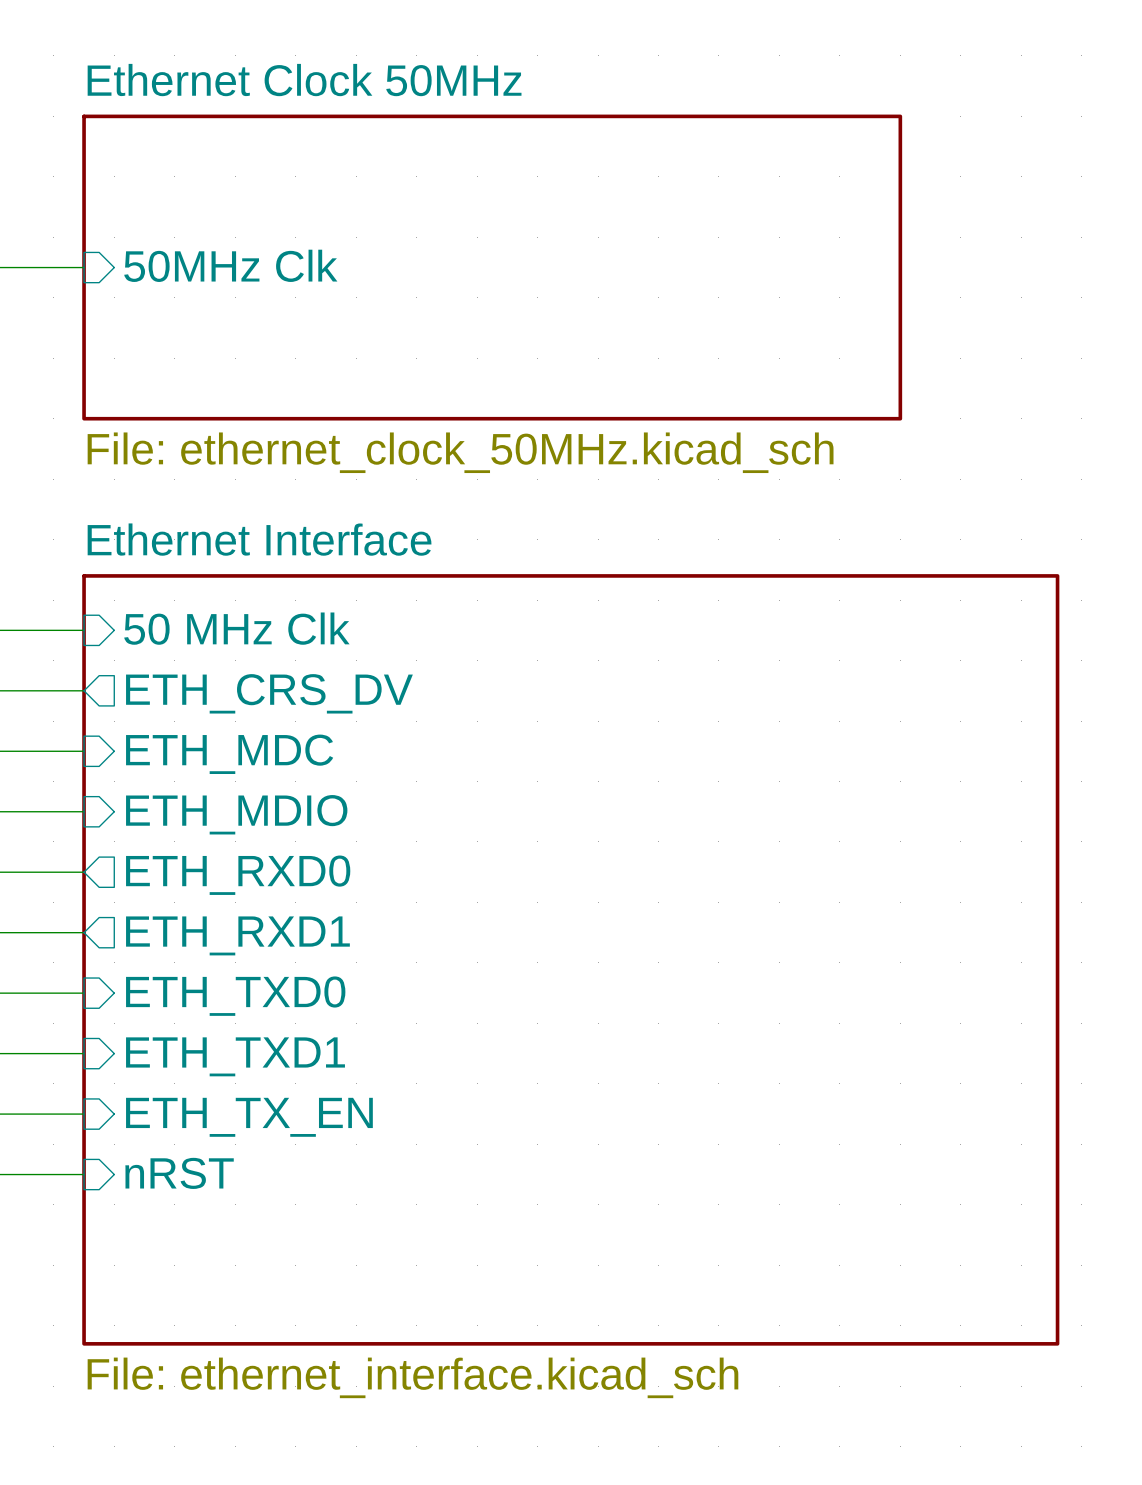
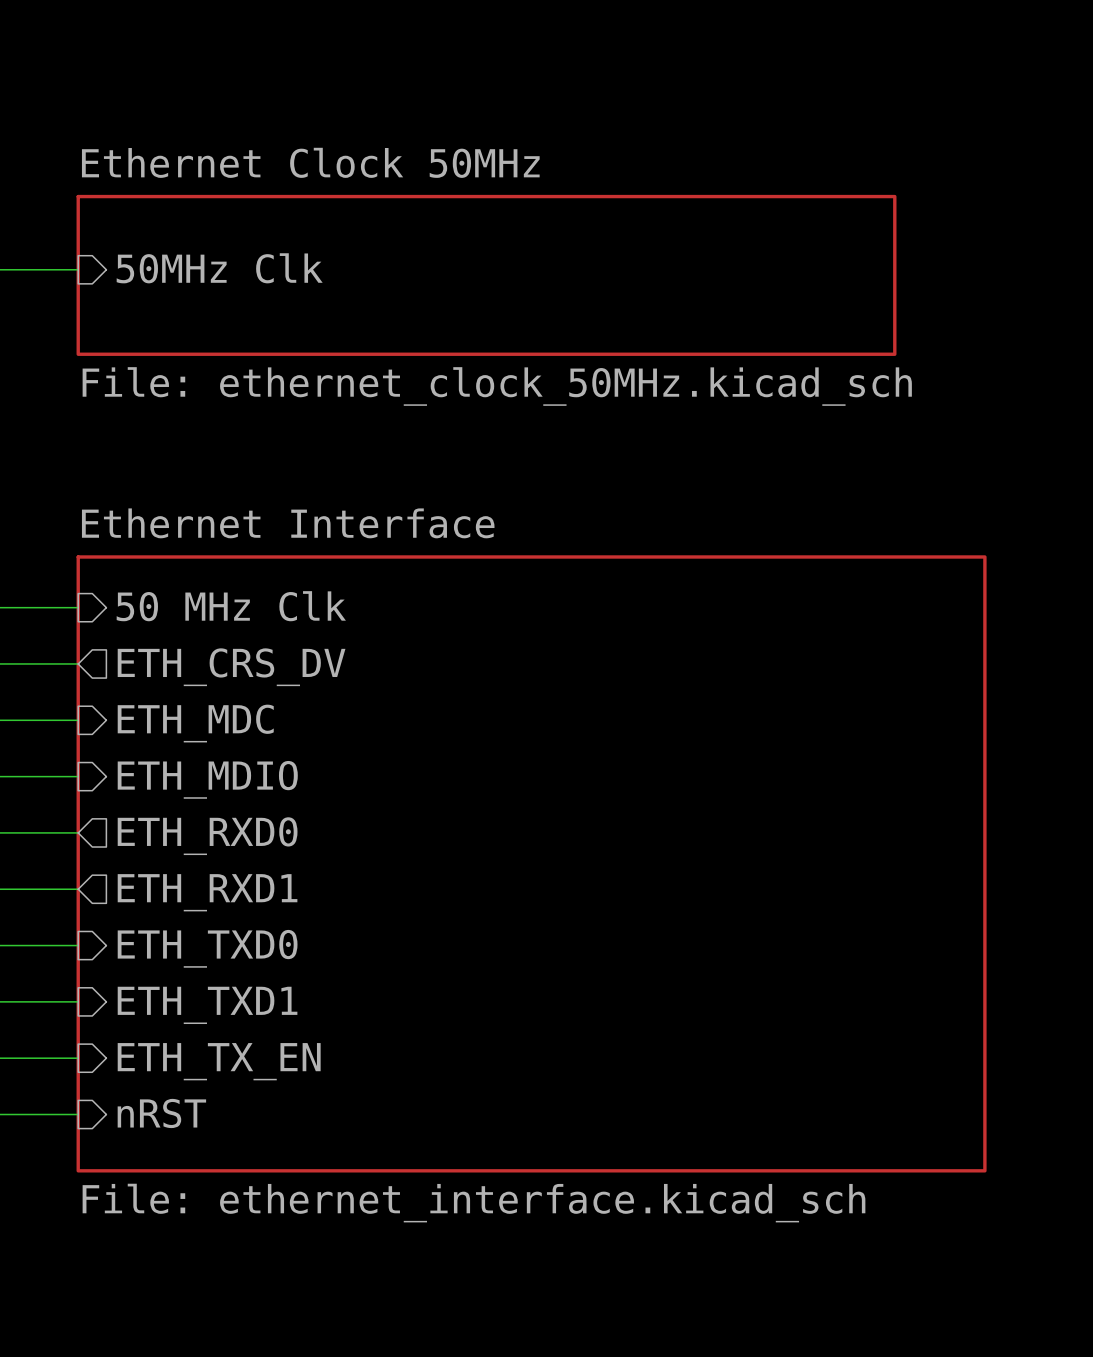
sheet Ethernet Clock 50MHz name position: Ethernet Clock 50MHz (304, 80) -> Ethernet Clock 50MHz (310, 162)
sheet Ethernet Clock 50MHz shape: [82, 114, 903, 421] -> [76, 194, 897, 356]
sheet Ethernet Clock 50MHz value position: File: ethernet_clock_50MHz.kicad_sch (460, 452) -> File: ethernet_clock_50MHz.kicad_sch (497, 386)
sheet Ethernet Interface: none -> File: ethernet_interface.kicad_sch (531, 863)
sheet Ethernet Interface: File: ethernet_interface.kicad_sch (570, 959) -> none

